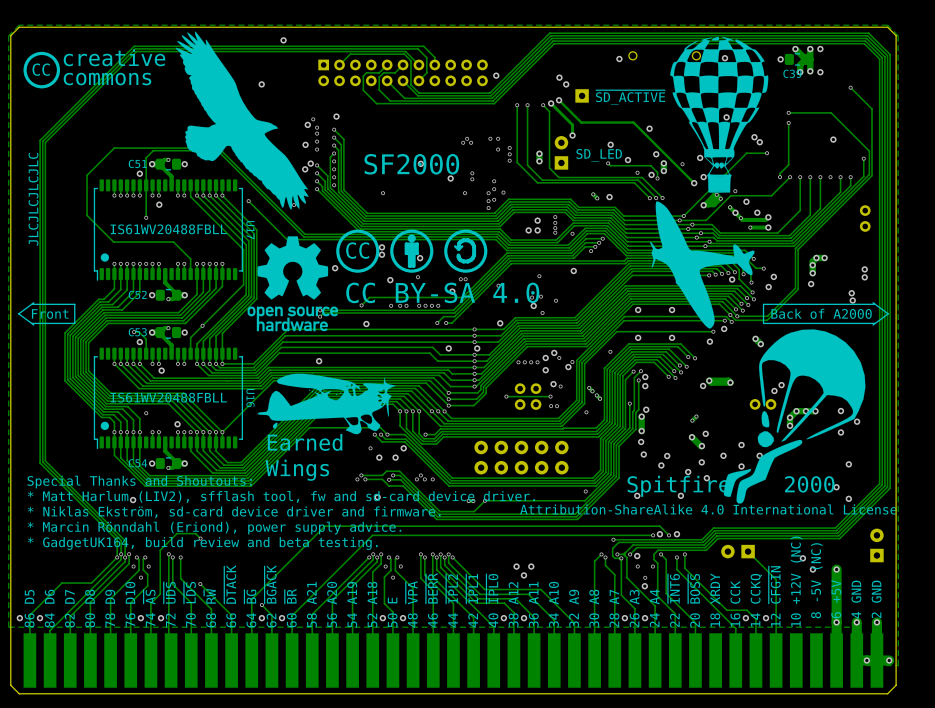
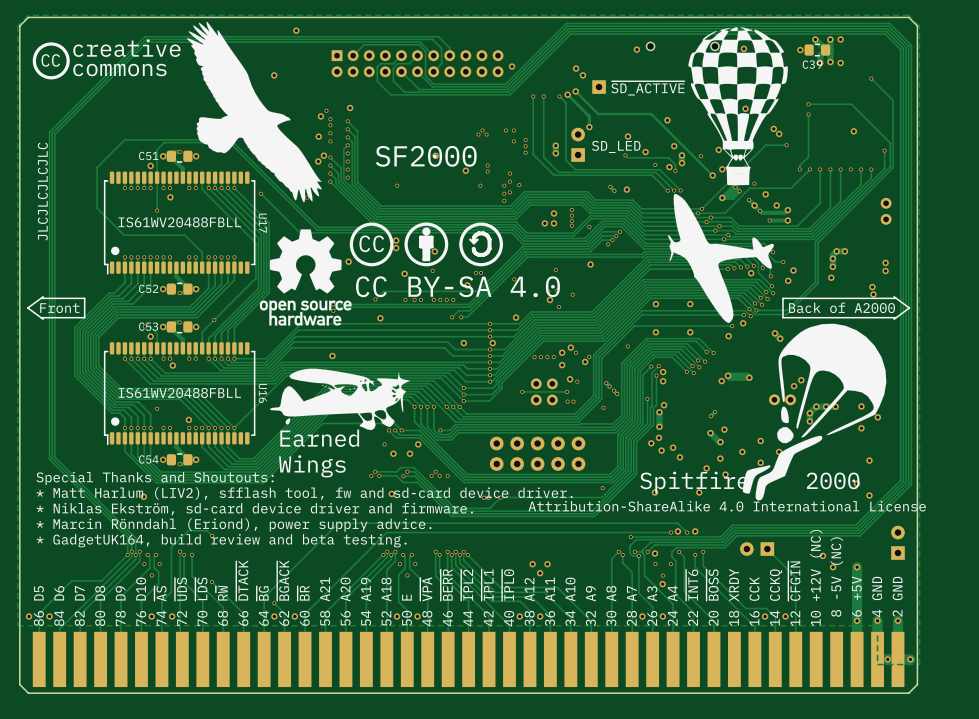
via: none -> (651, 443)
via: none -> (673, 447)
via: (667, 456) -> none
via: none -> (679, 457)
via: (661, 465) -> none

